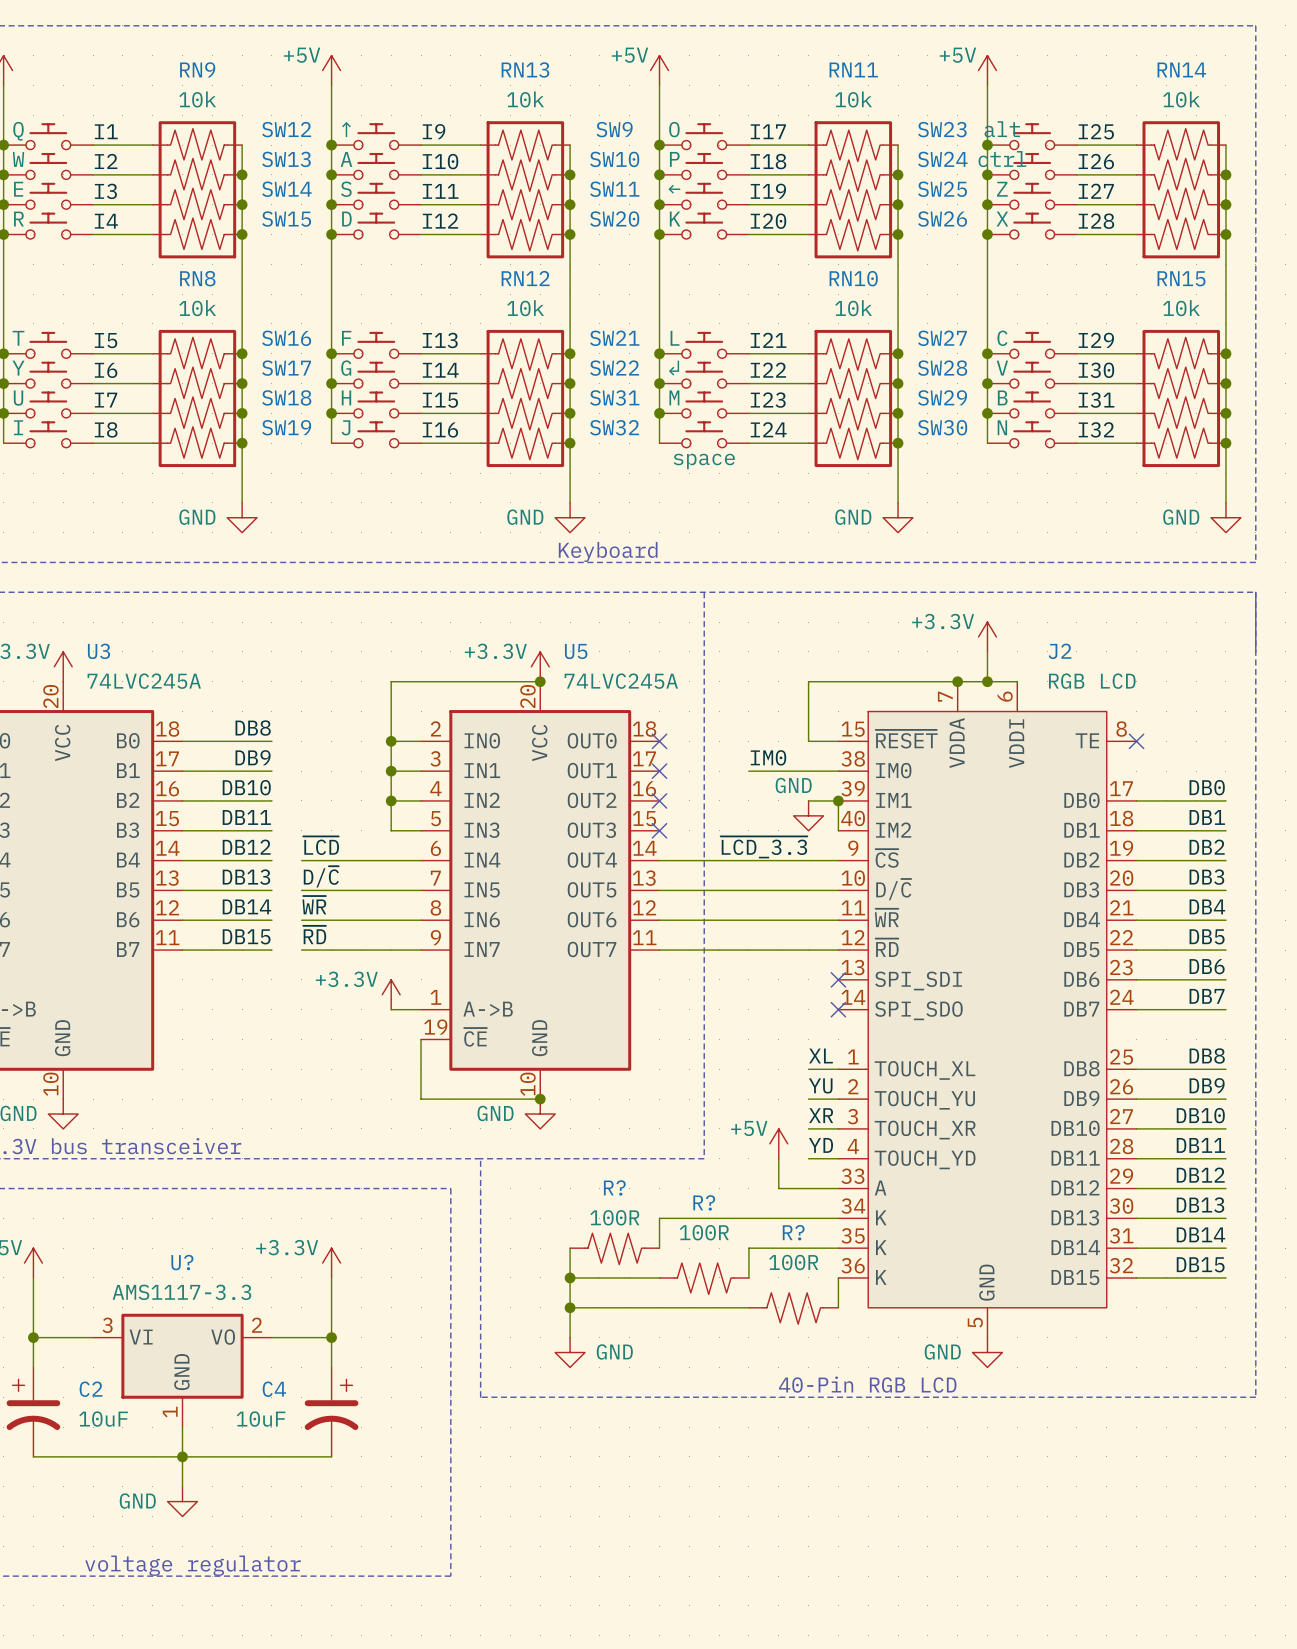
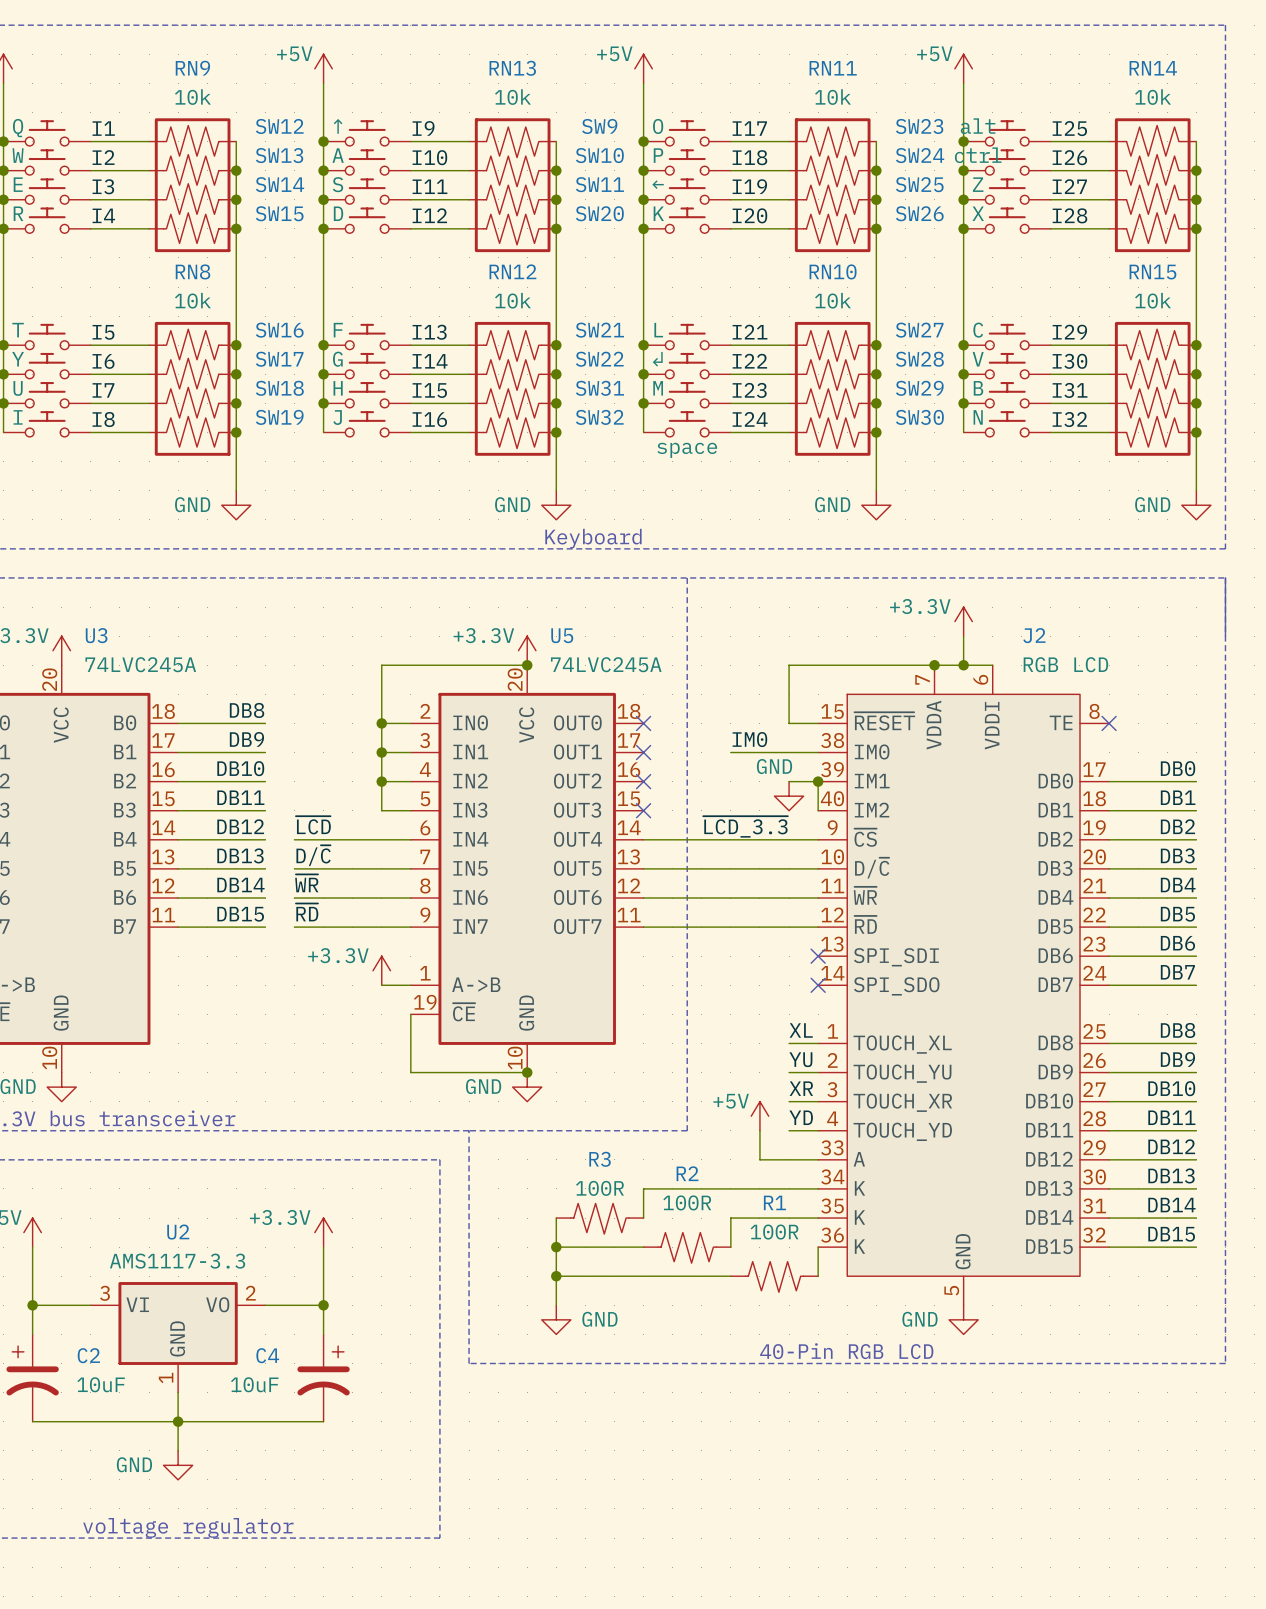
R? name: R? (614, 1187) -> R3 (600, 1159)
R? name: R? (704, 1202) -> R2 (687, 1173)
R? name: R? (793, 1232) -> R1 (774, 1202)
U? name: U? (182, 1262) -> U2 (178, 1232)

